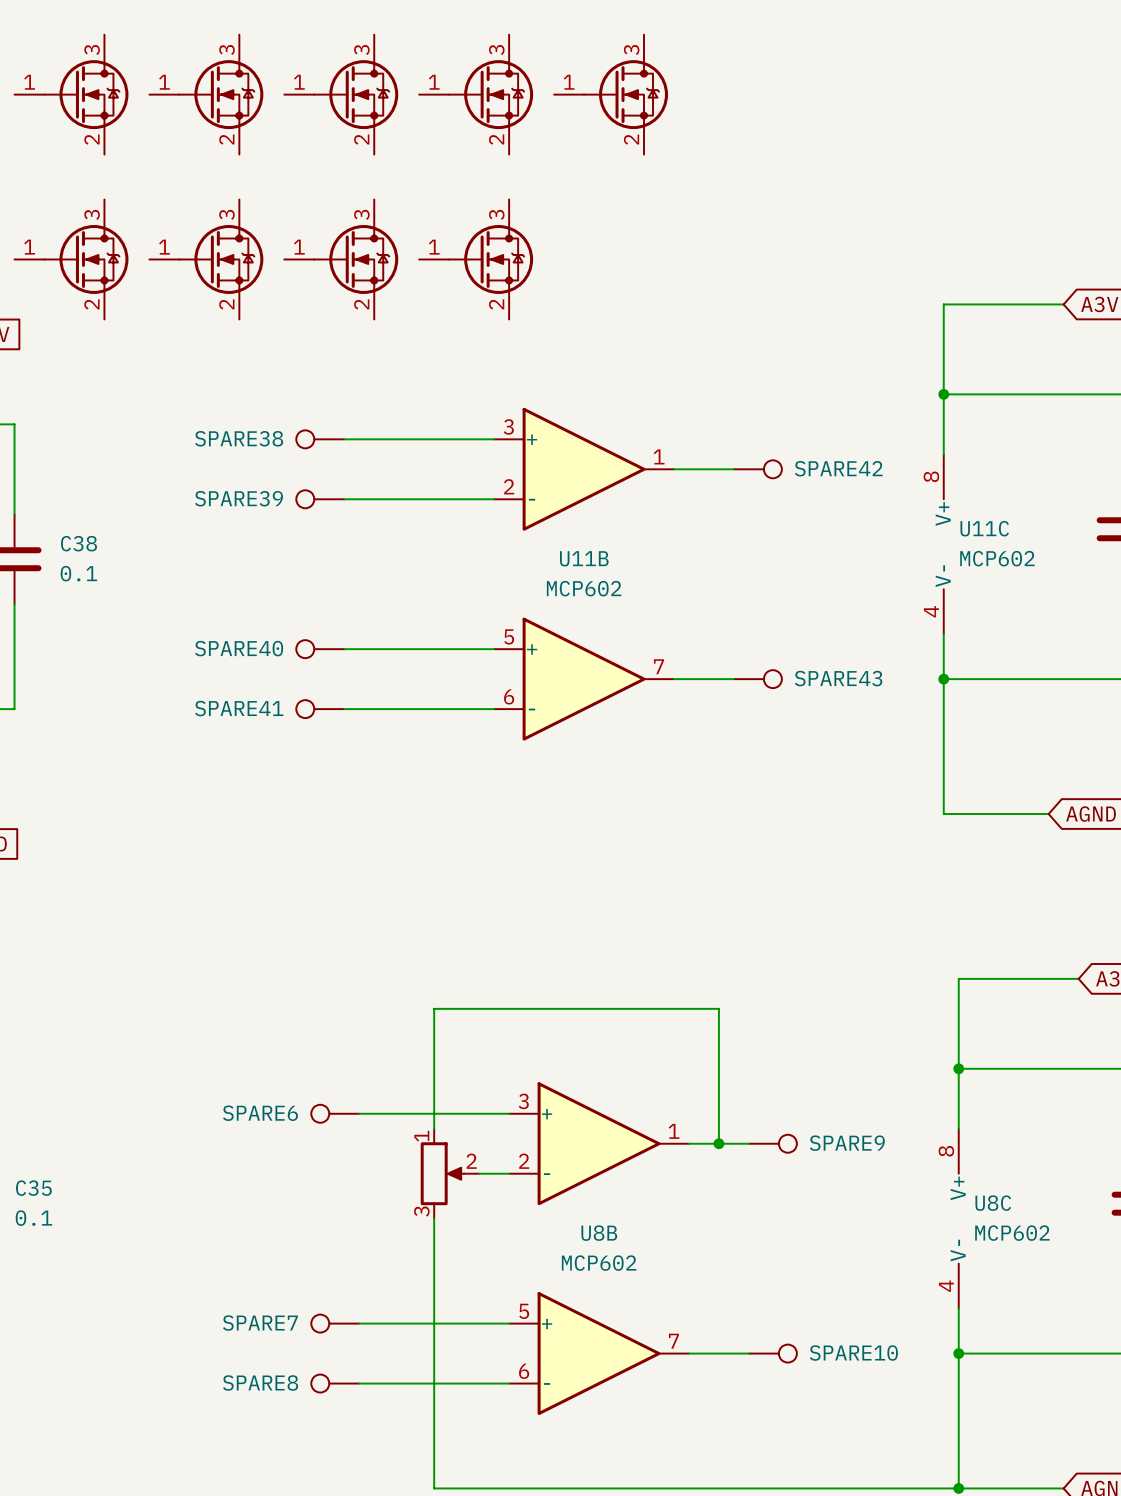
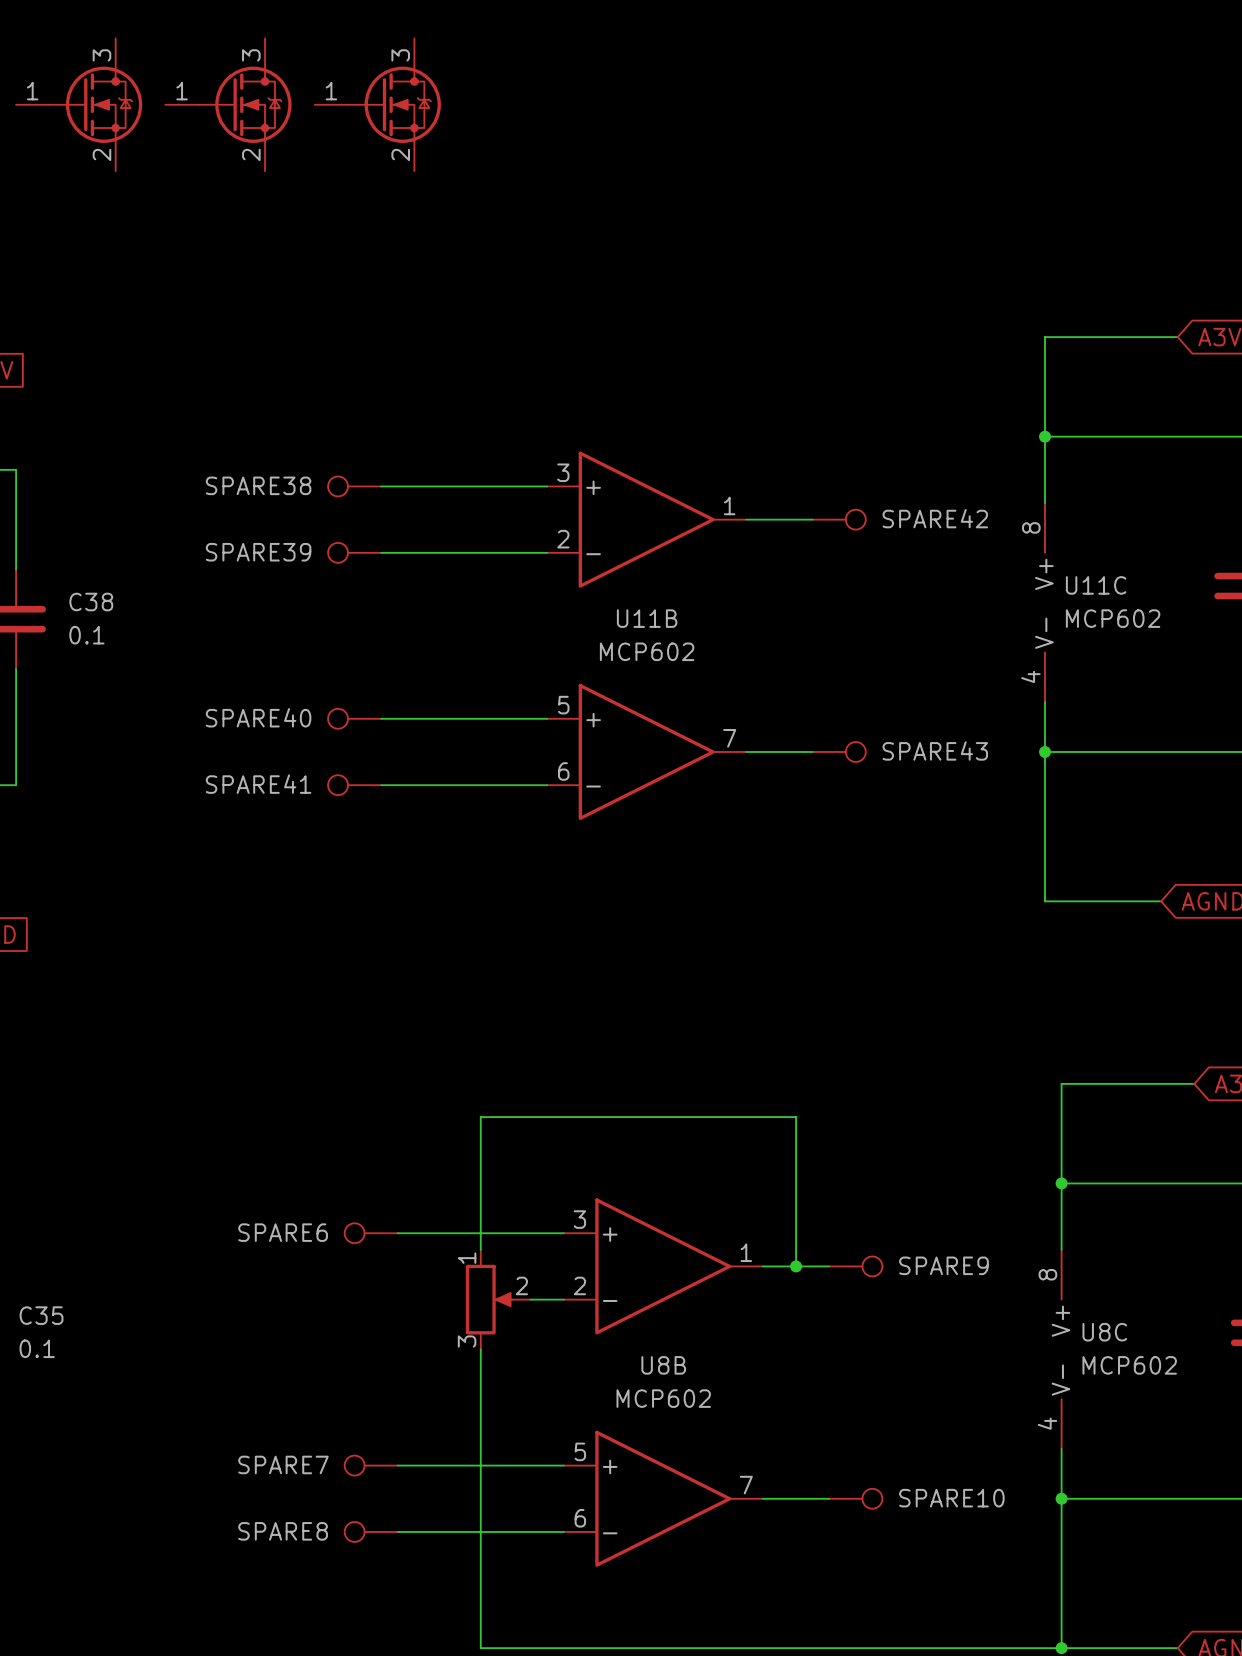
part: (476, 94) -> none
part: (611, 94) -> none
part: (71, 259) -> none
part: (206, 259) -> none
part: (341, 259) -> none
part: (476, 259) -> none

